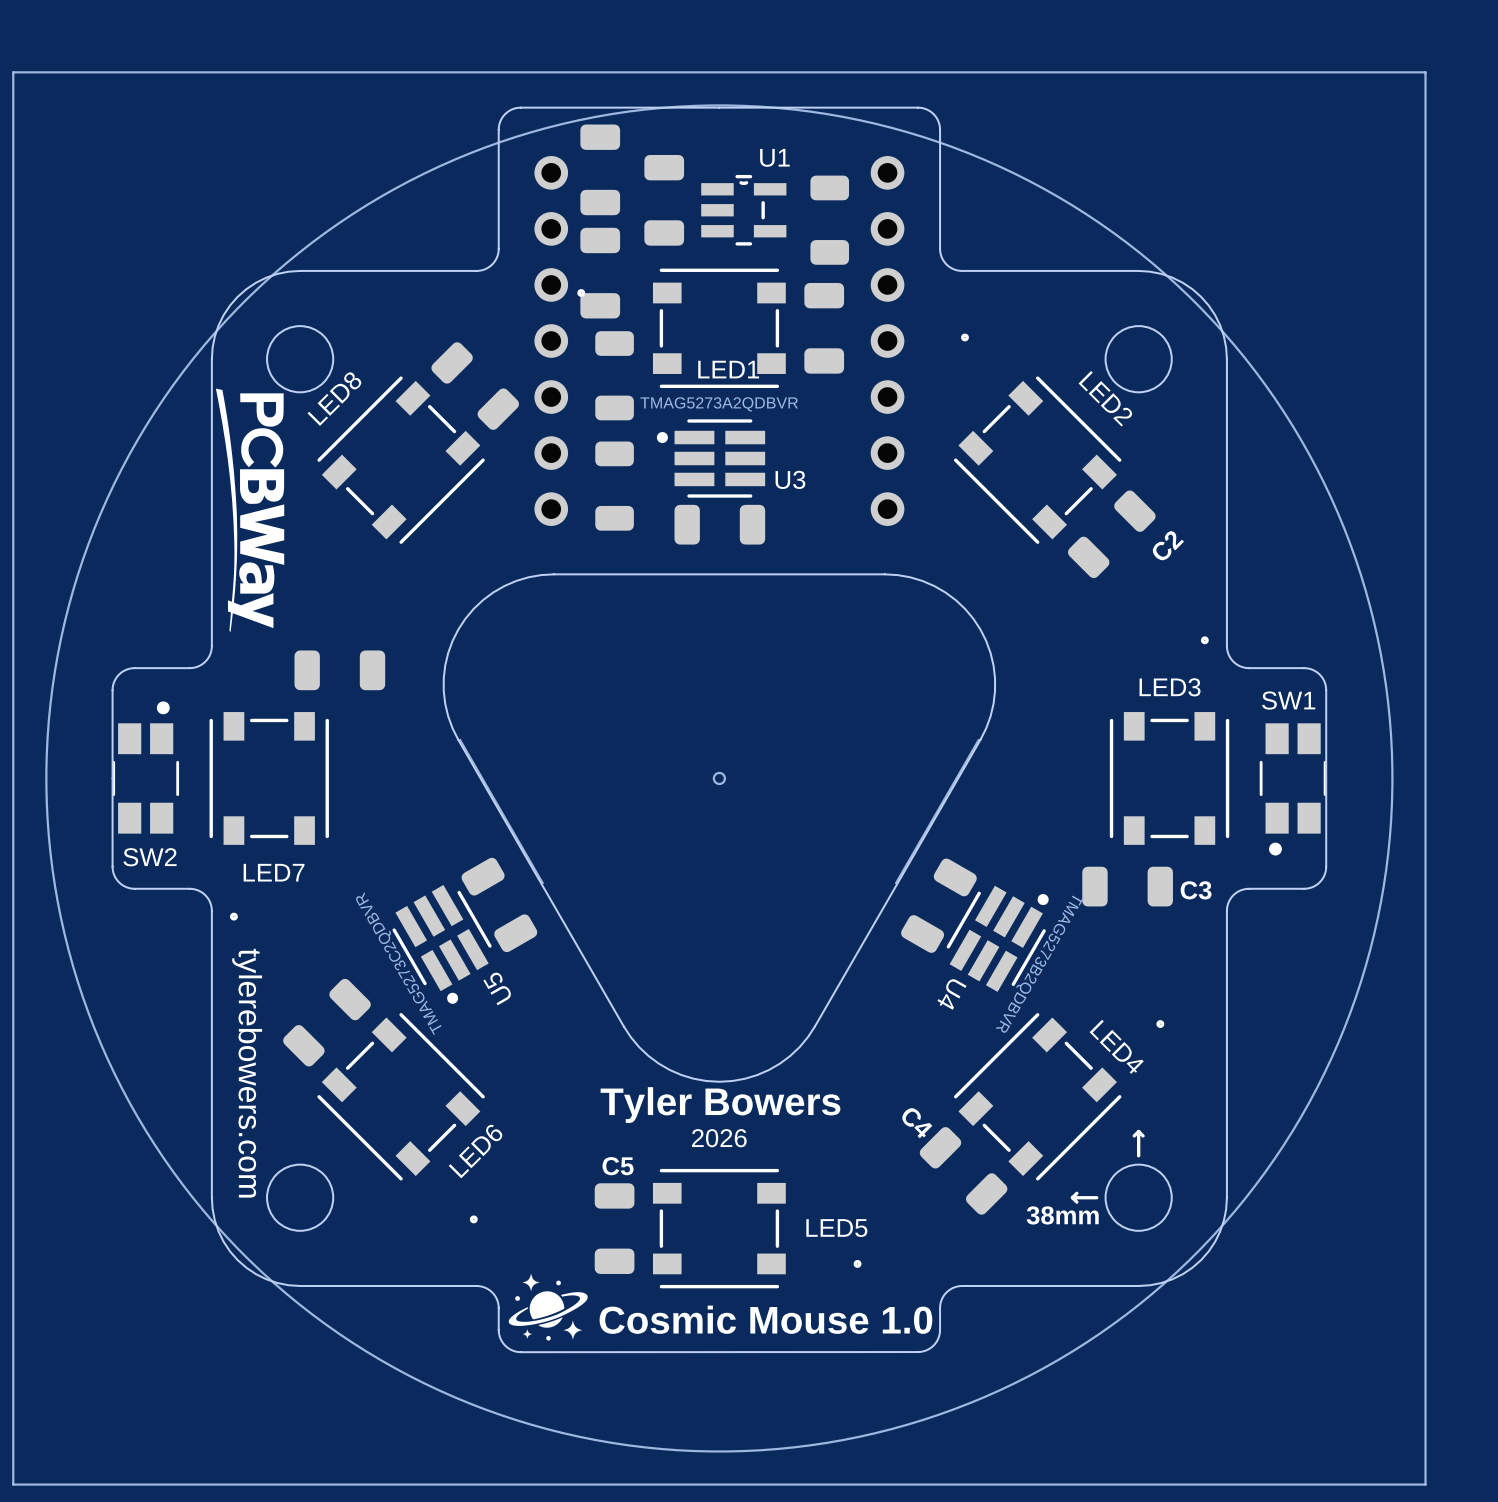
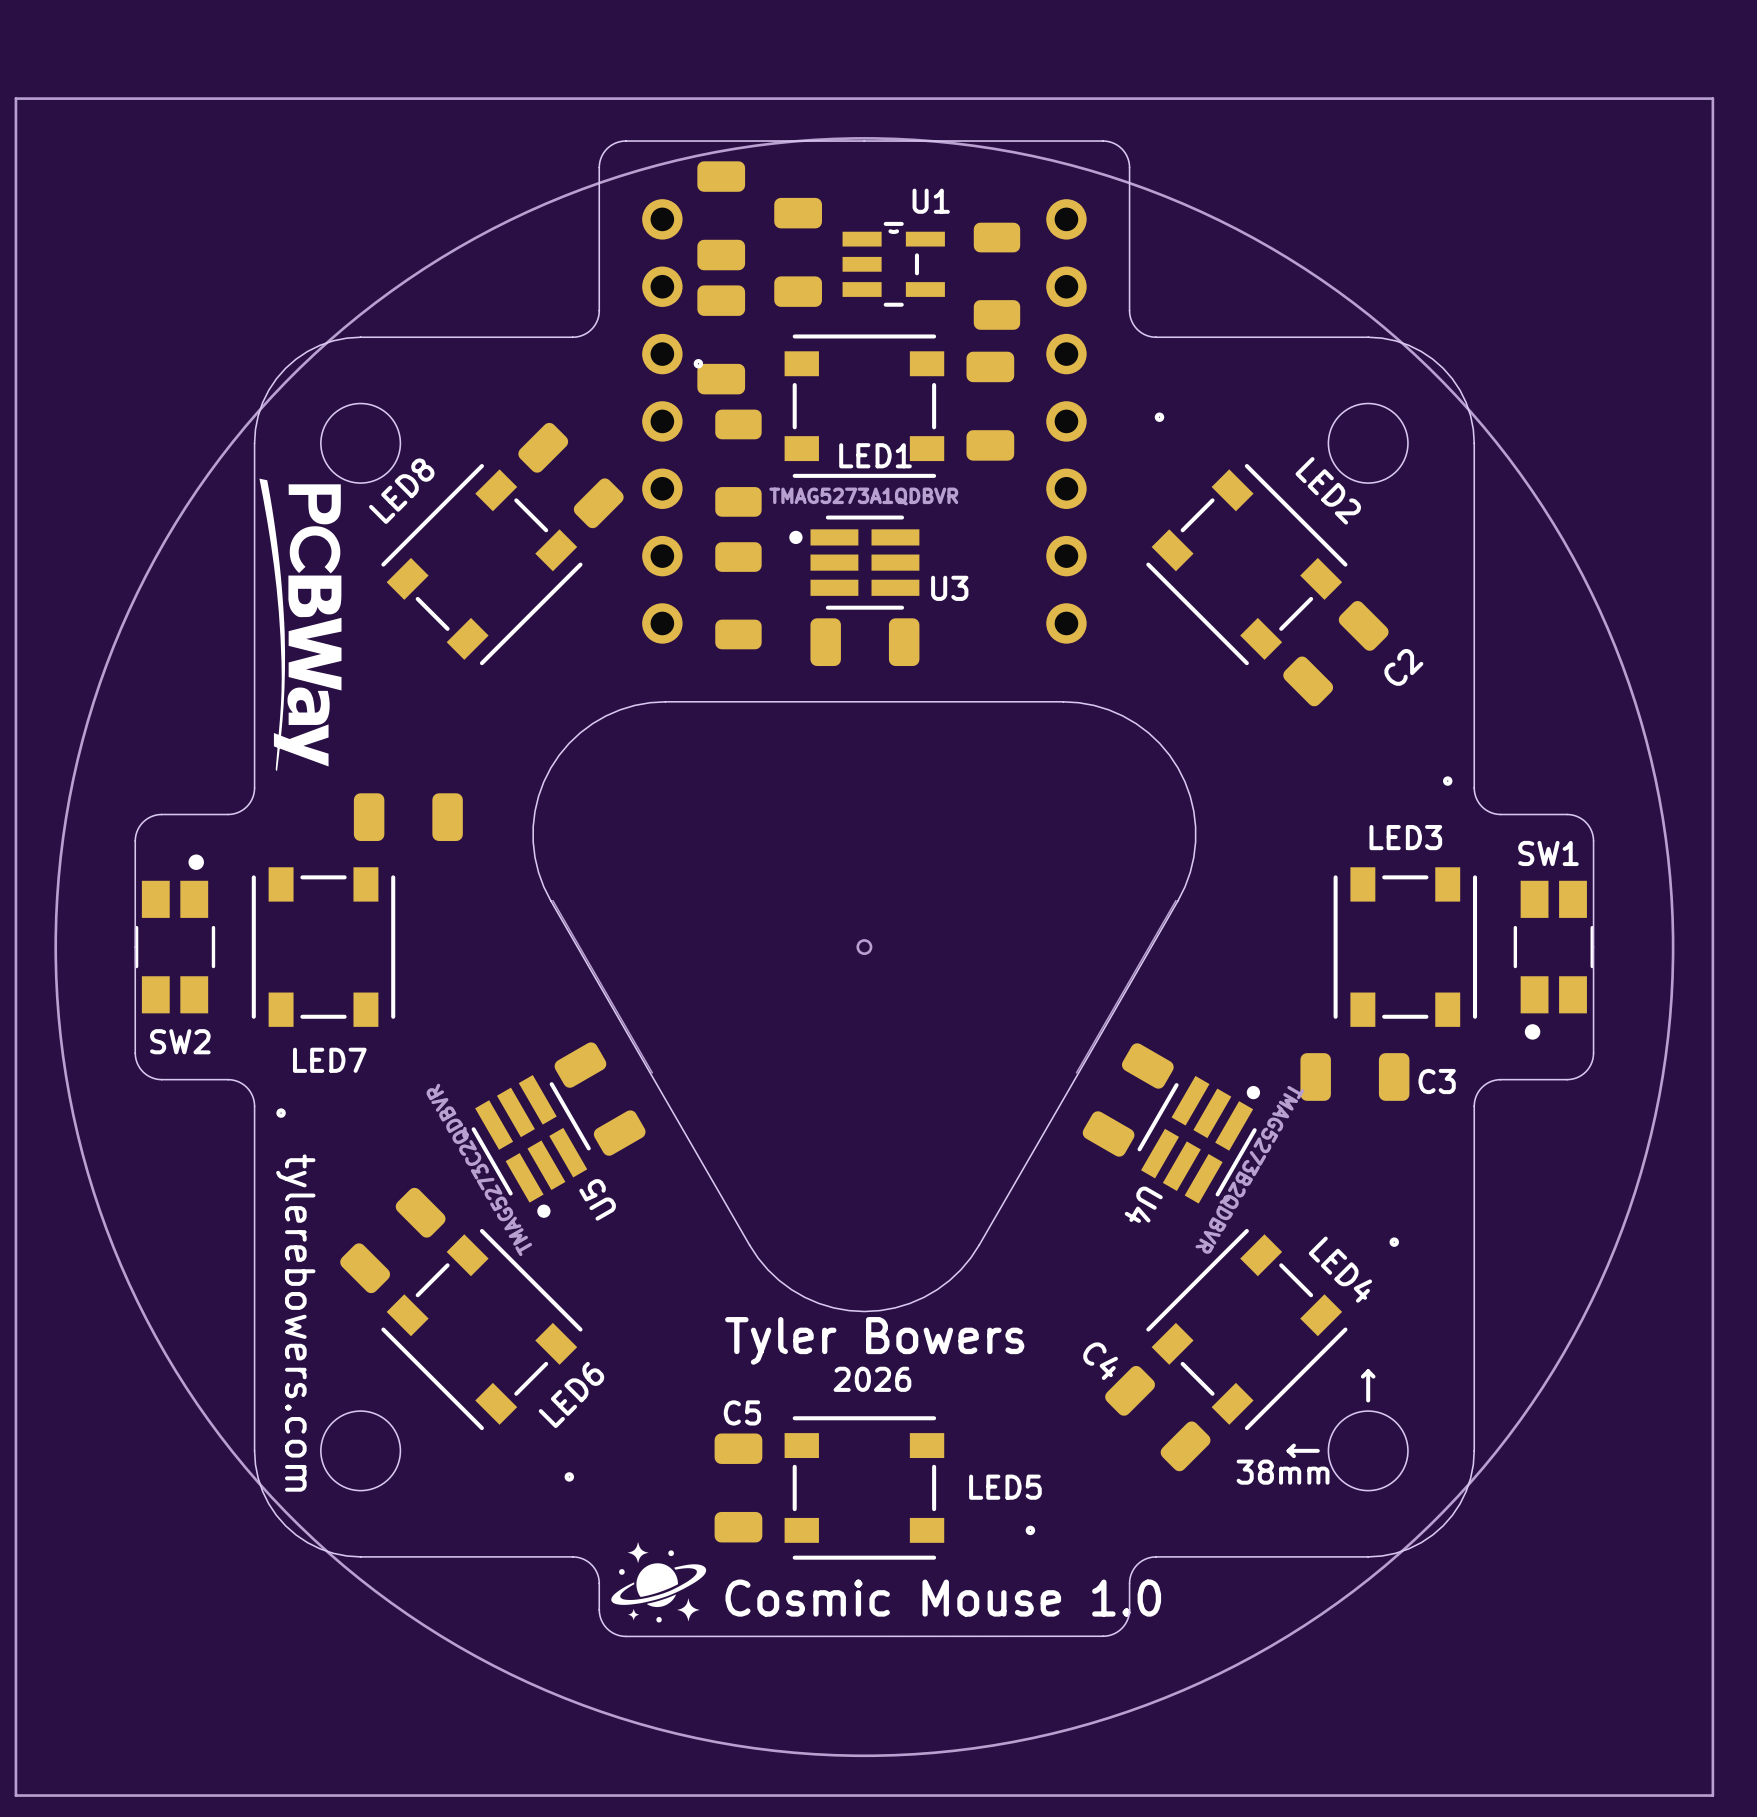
U3 text: TMAG5273A2QDBVR (719, 404) -> TMAG5273A1QDBVR (863, 496)

